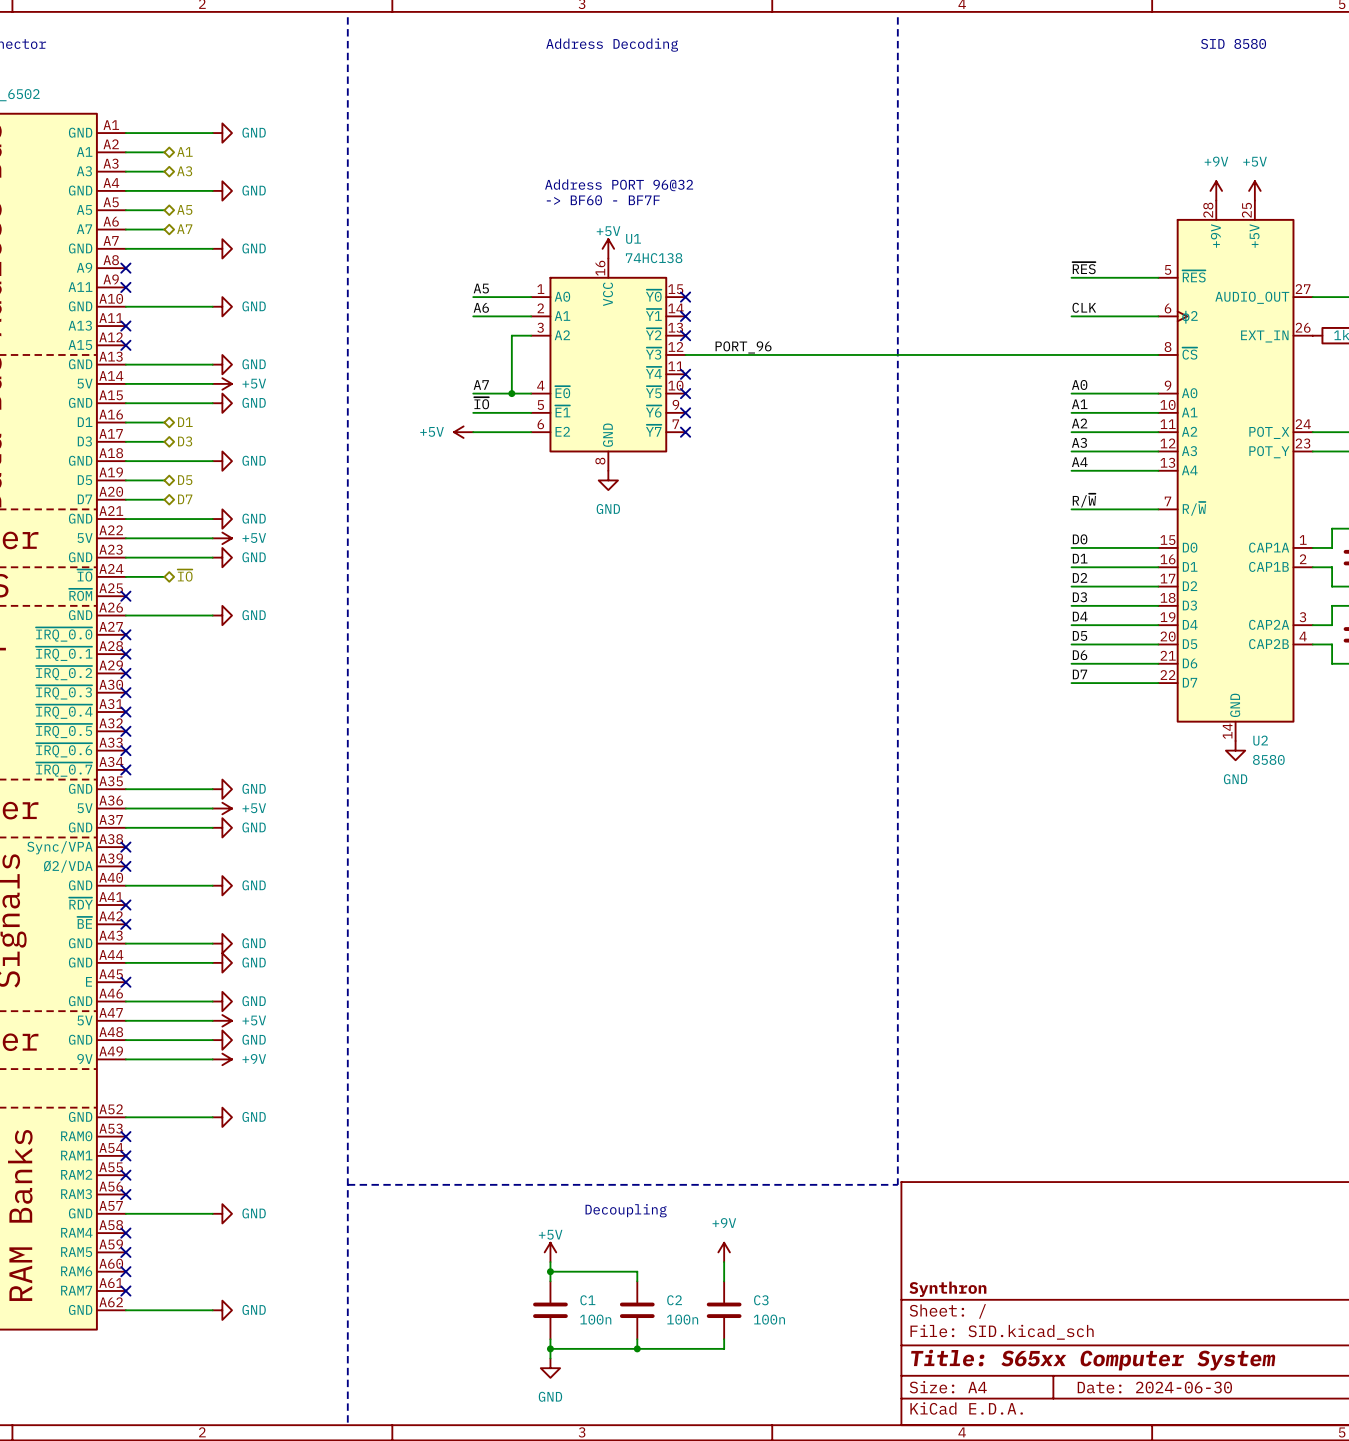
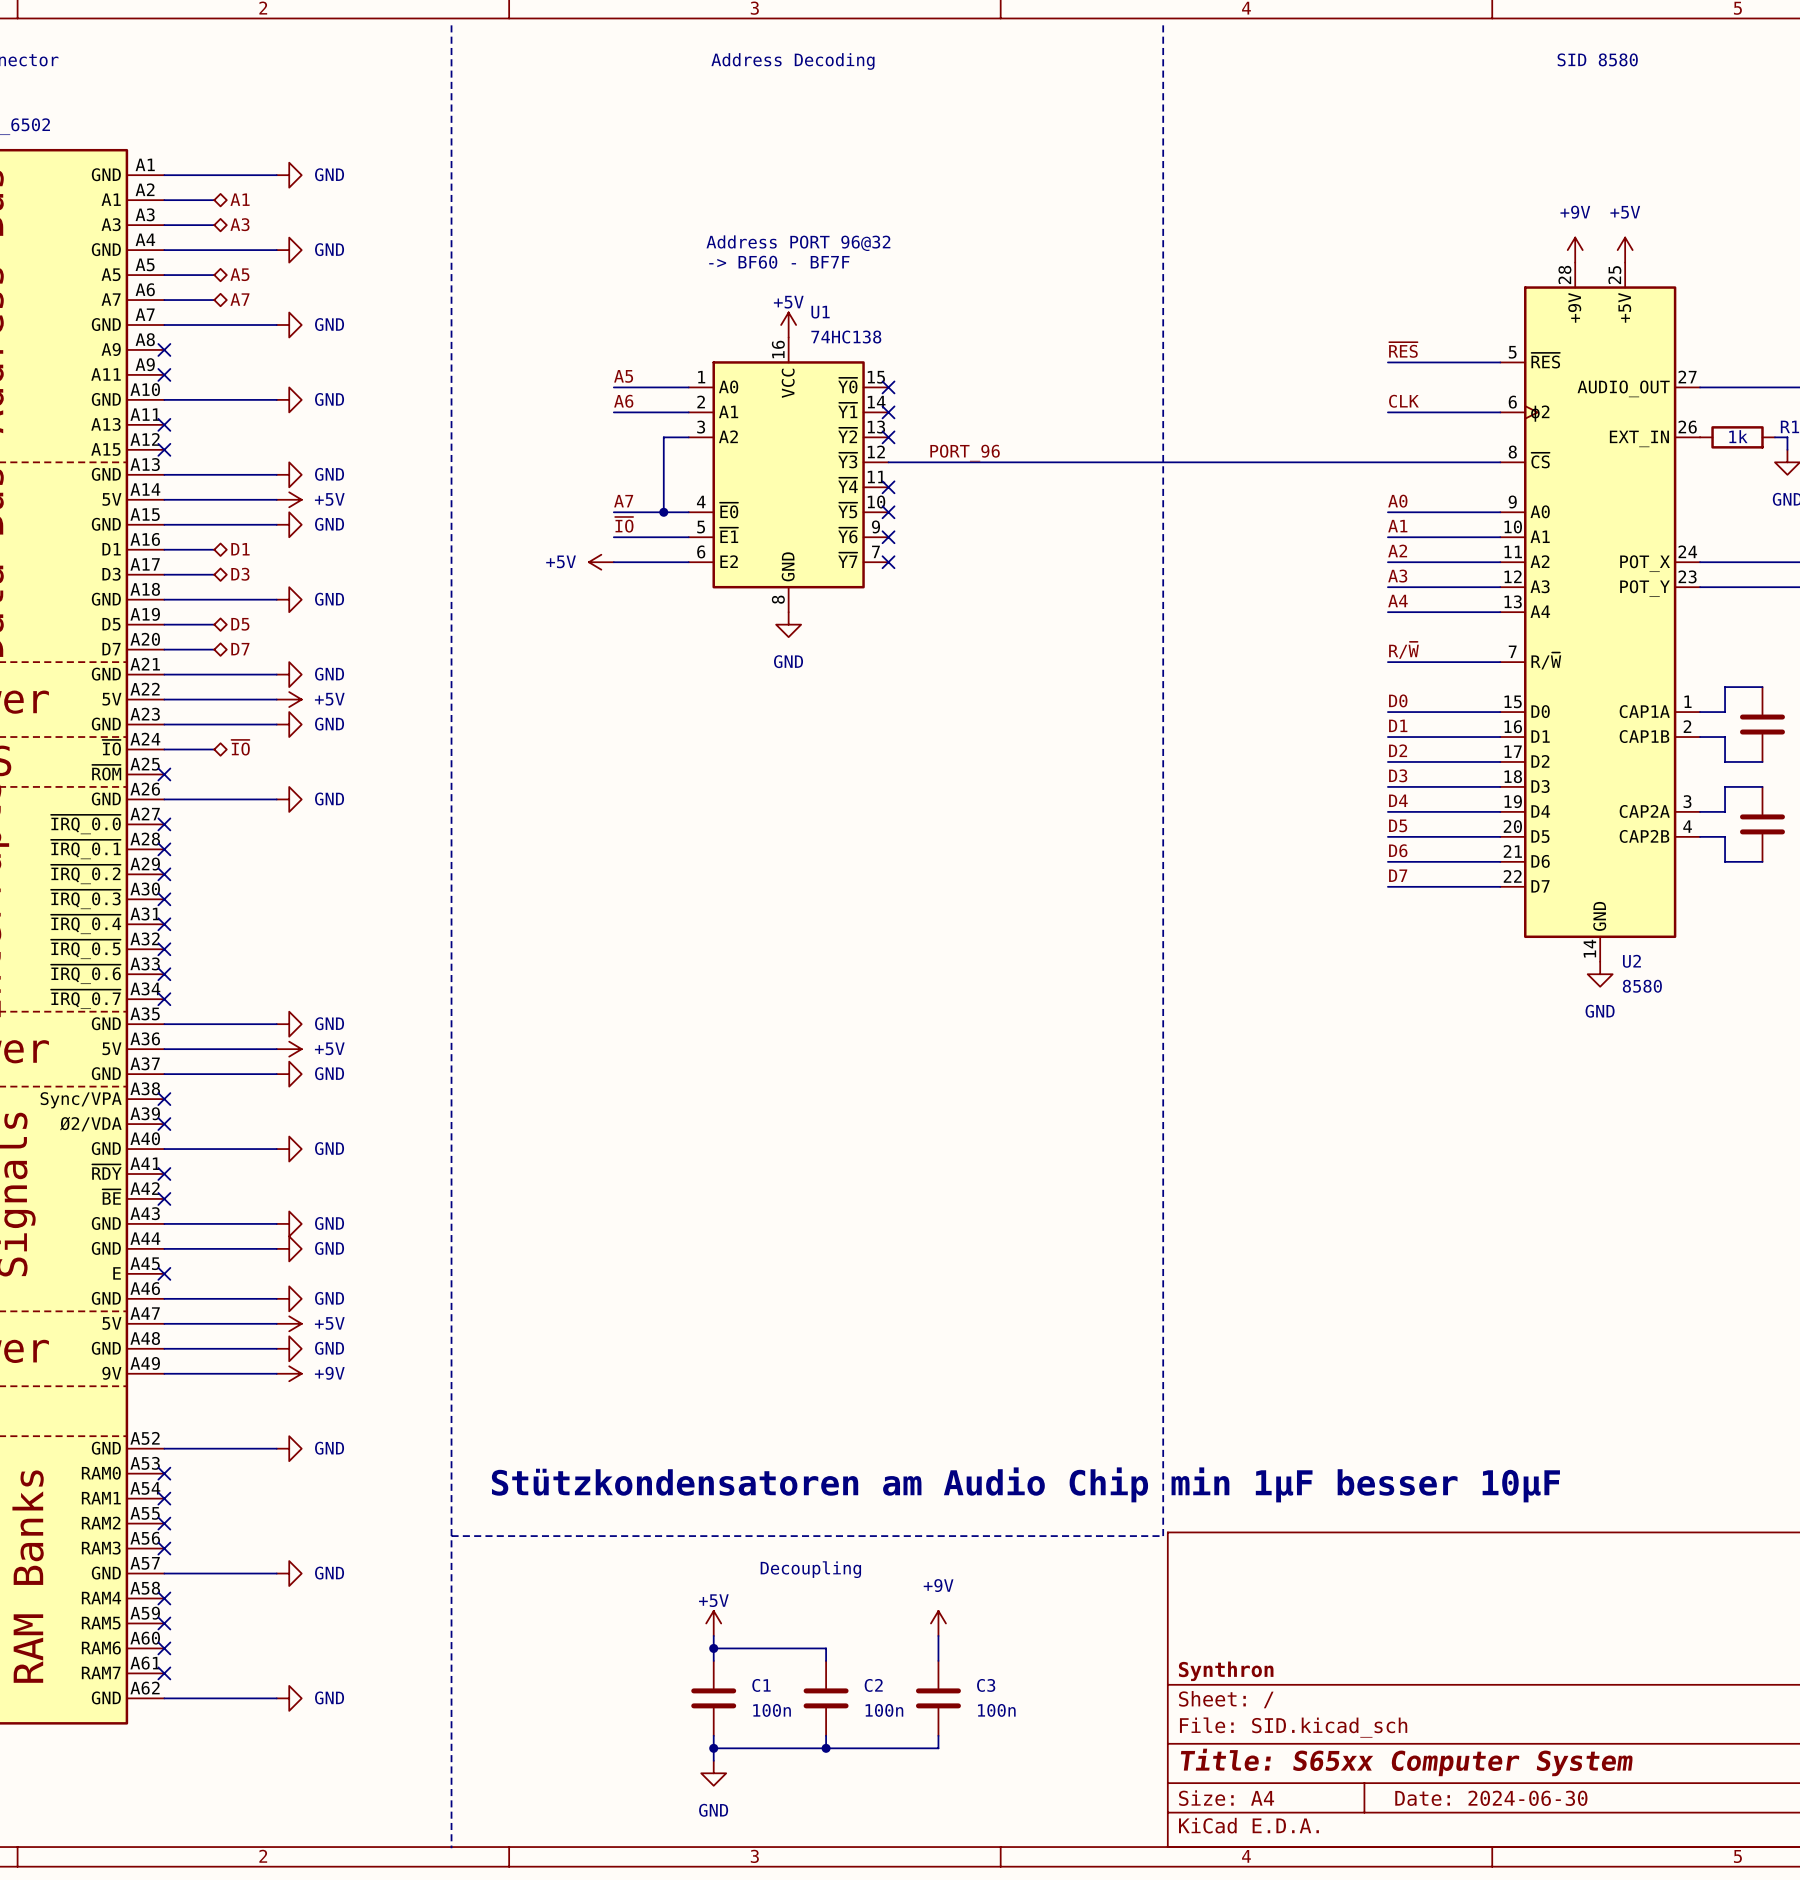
text: none -> Stützkondensatoren am Audio Chip min 1µF besser 10µF (1025, 1484)

